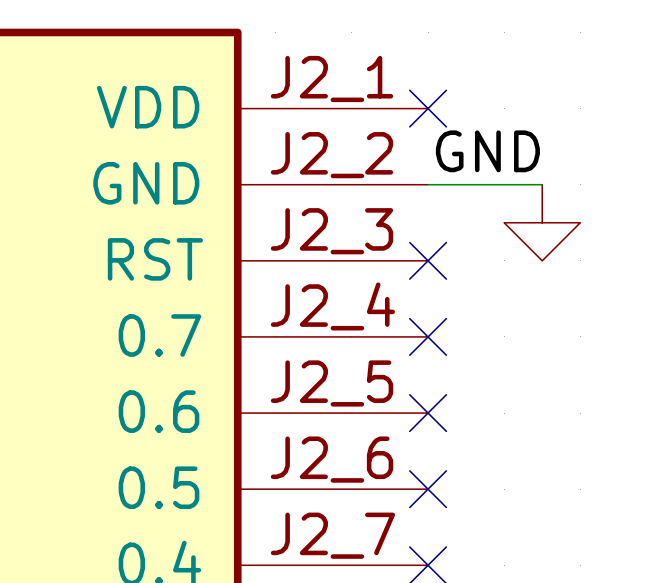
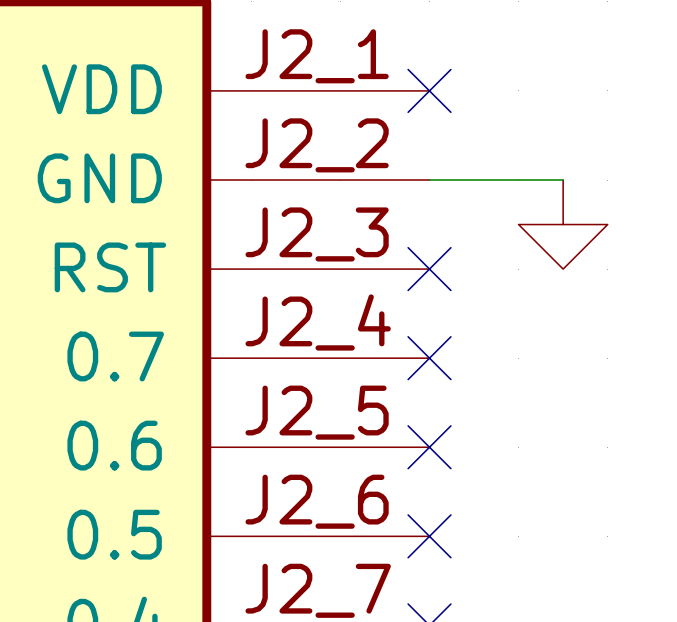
label: GND (487, 151) -> none

